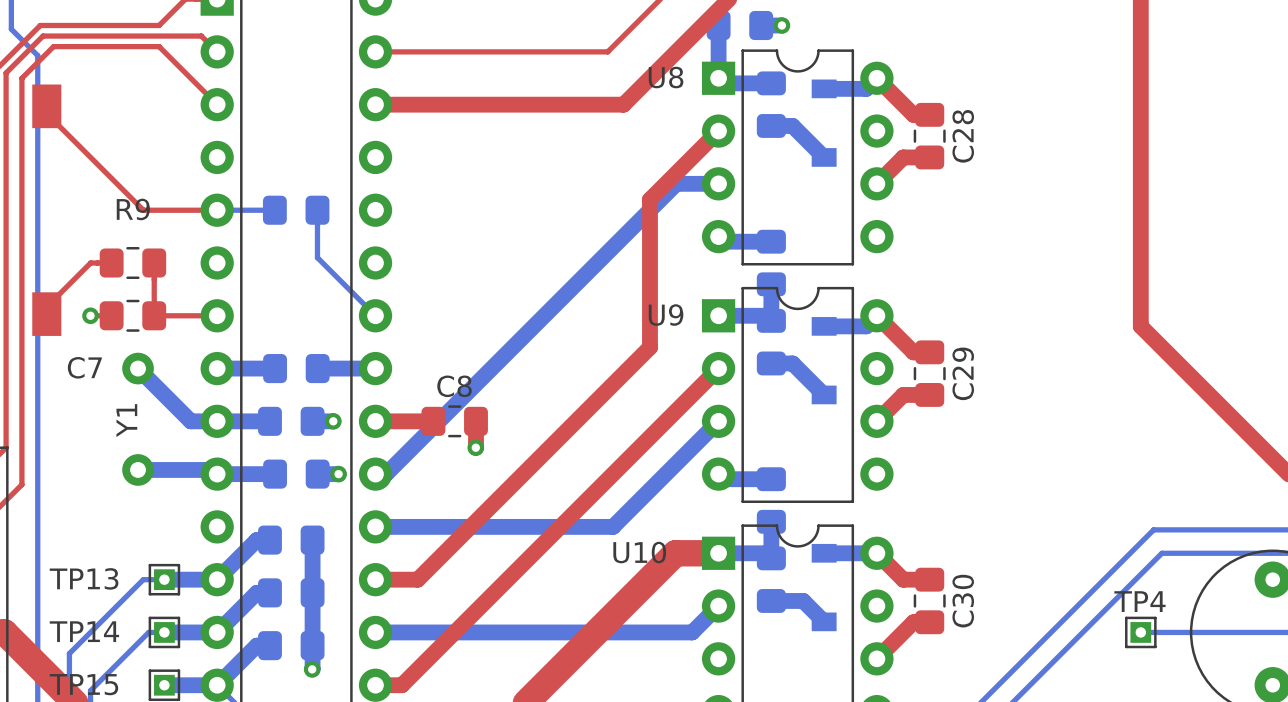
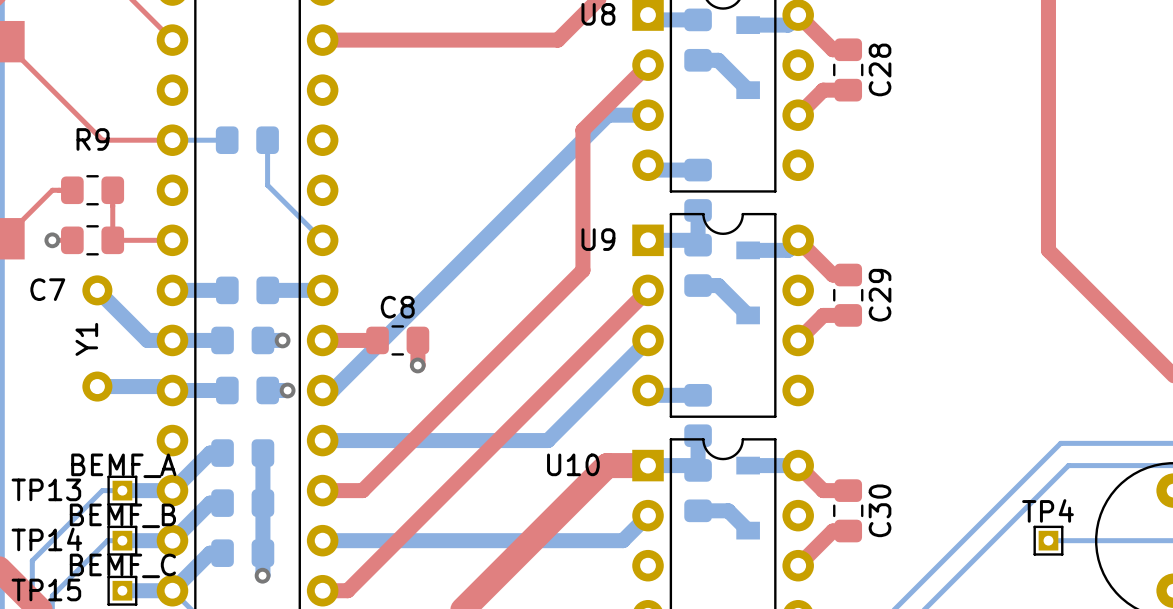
text: none -> BEMF_A (123, 465)
text: none -> BEMF_B (122, 515)
text: none -> BEMF_C (122, 565)

